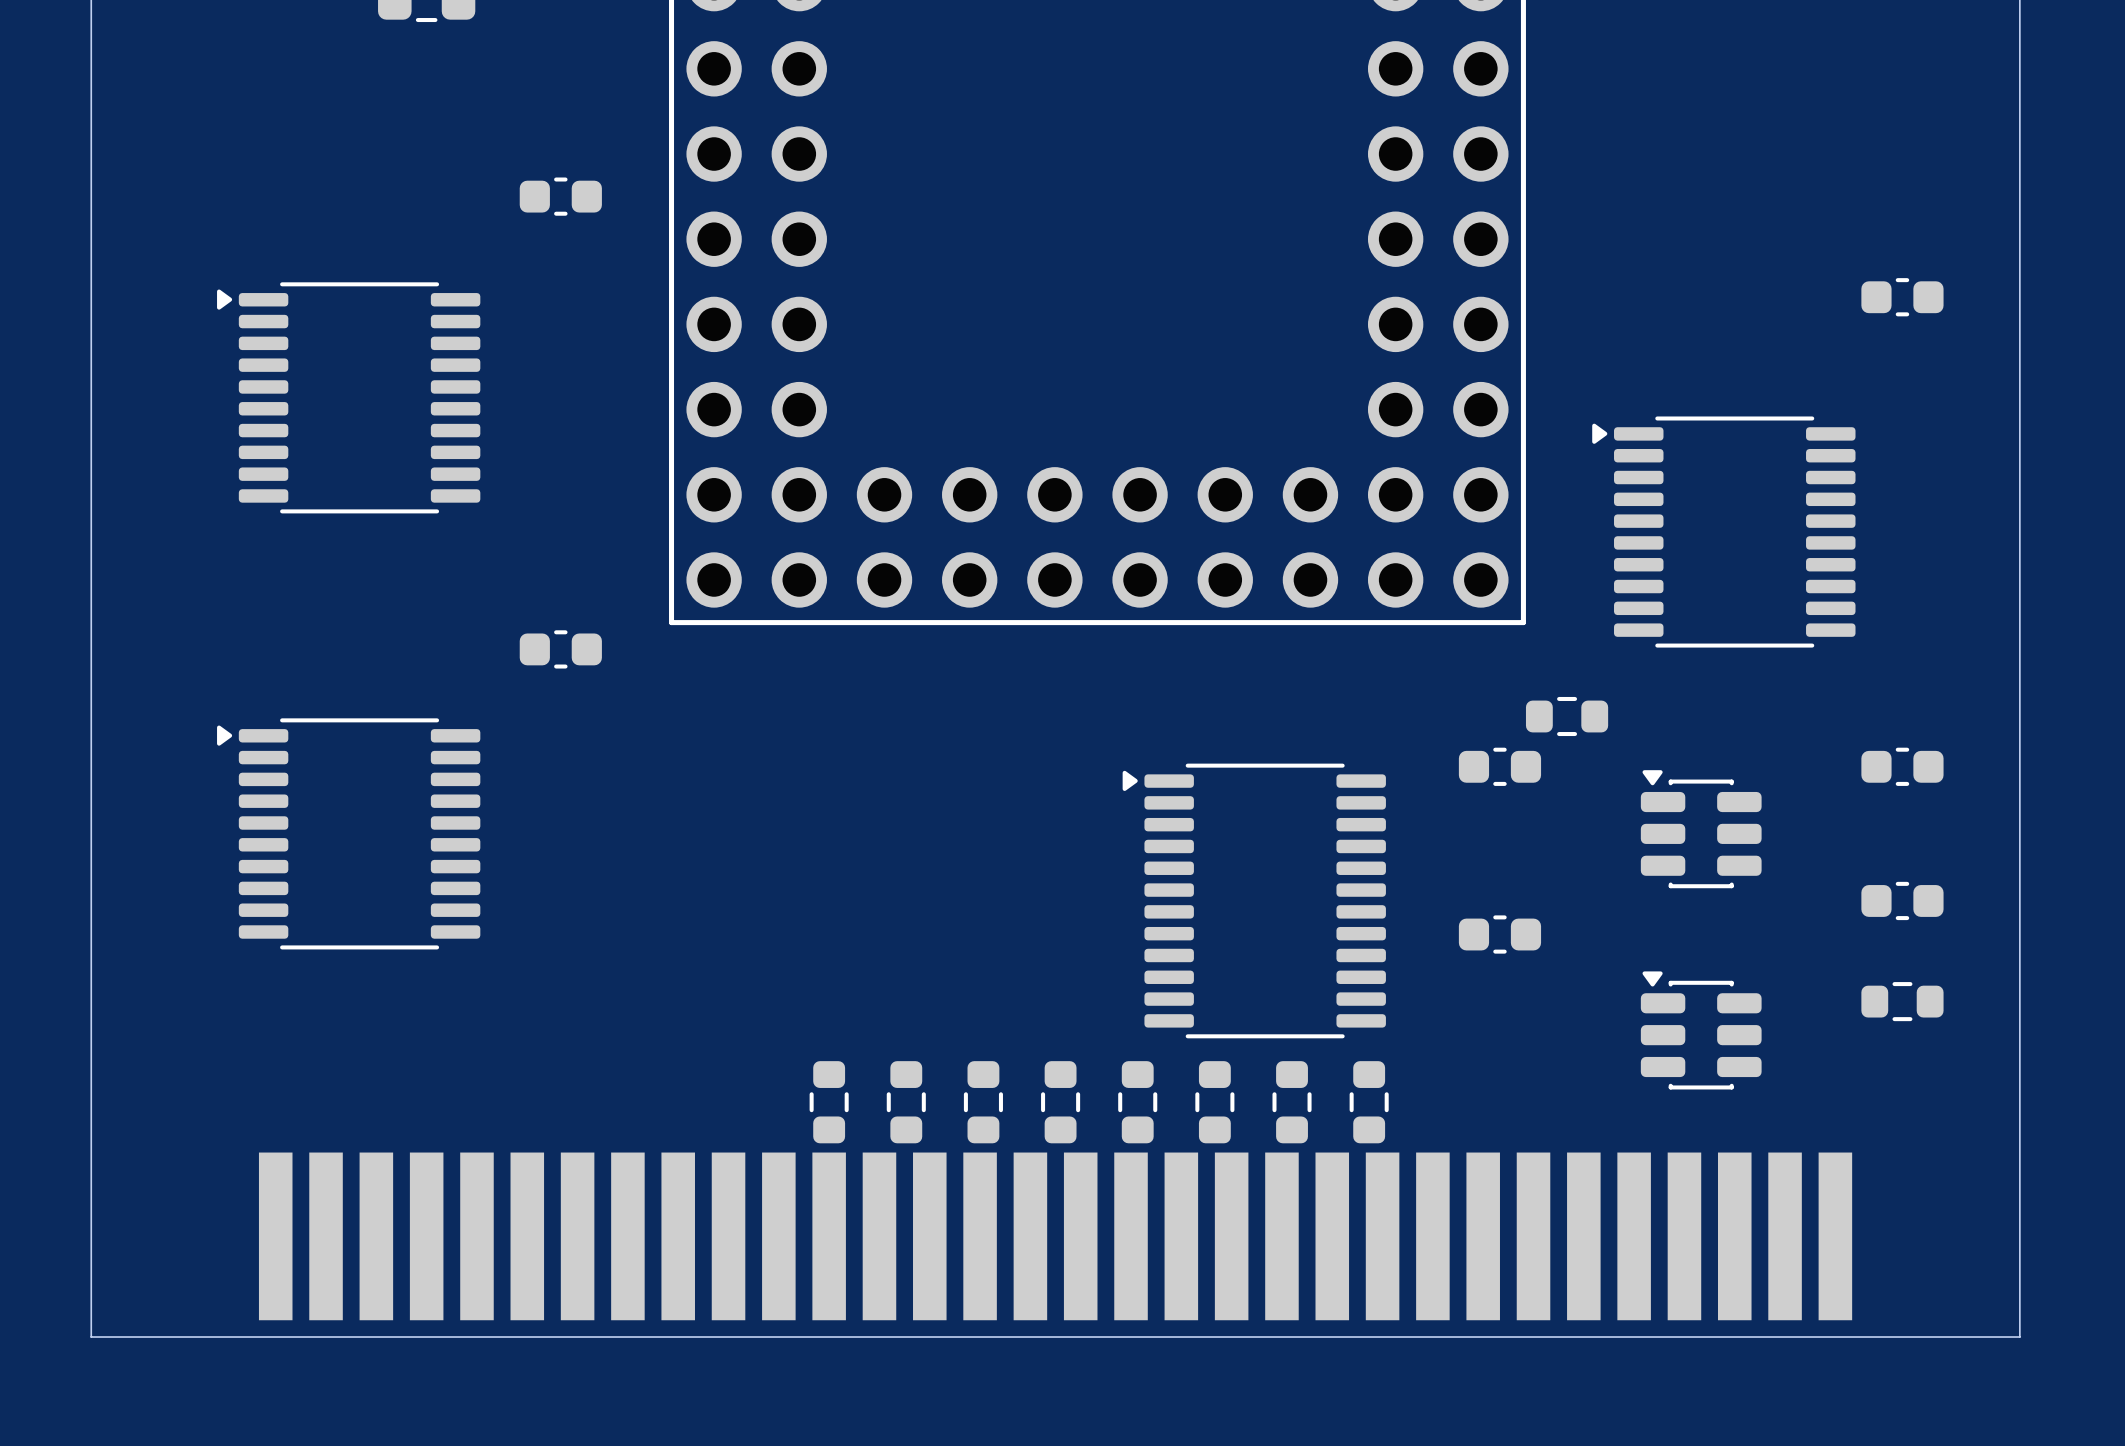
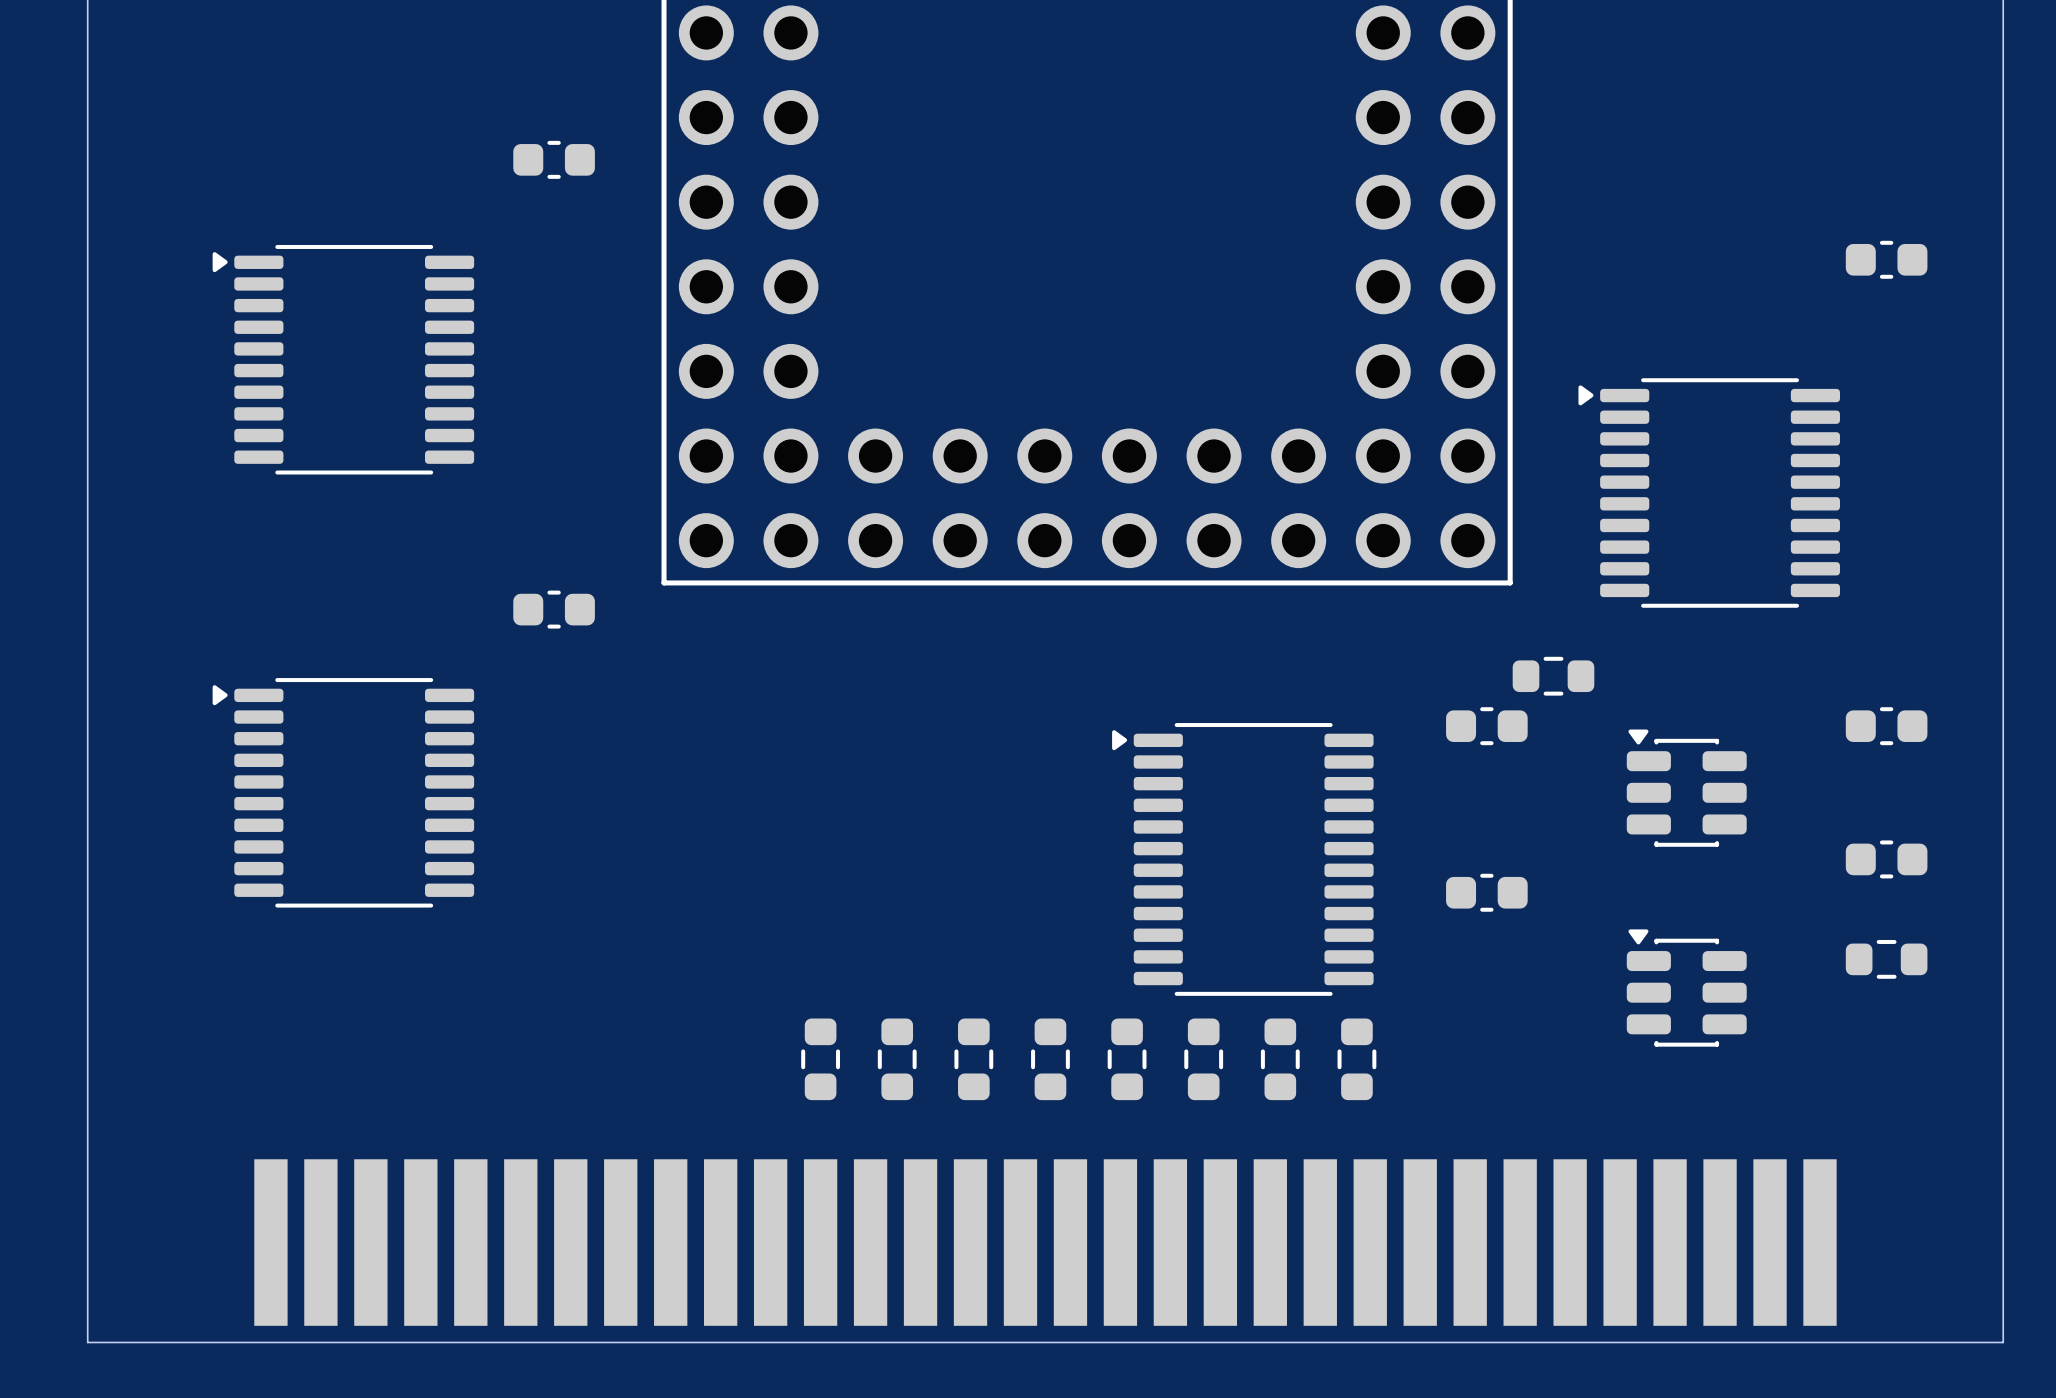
part position: (1055, 1236) -> (1045, 1242)
board edge: (91, 1337) (2019, 1337) -> (87, 1292) (87, 1342) (2003, 1342) (2003, 1292)

